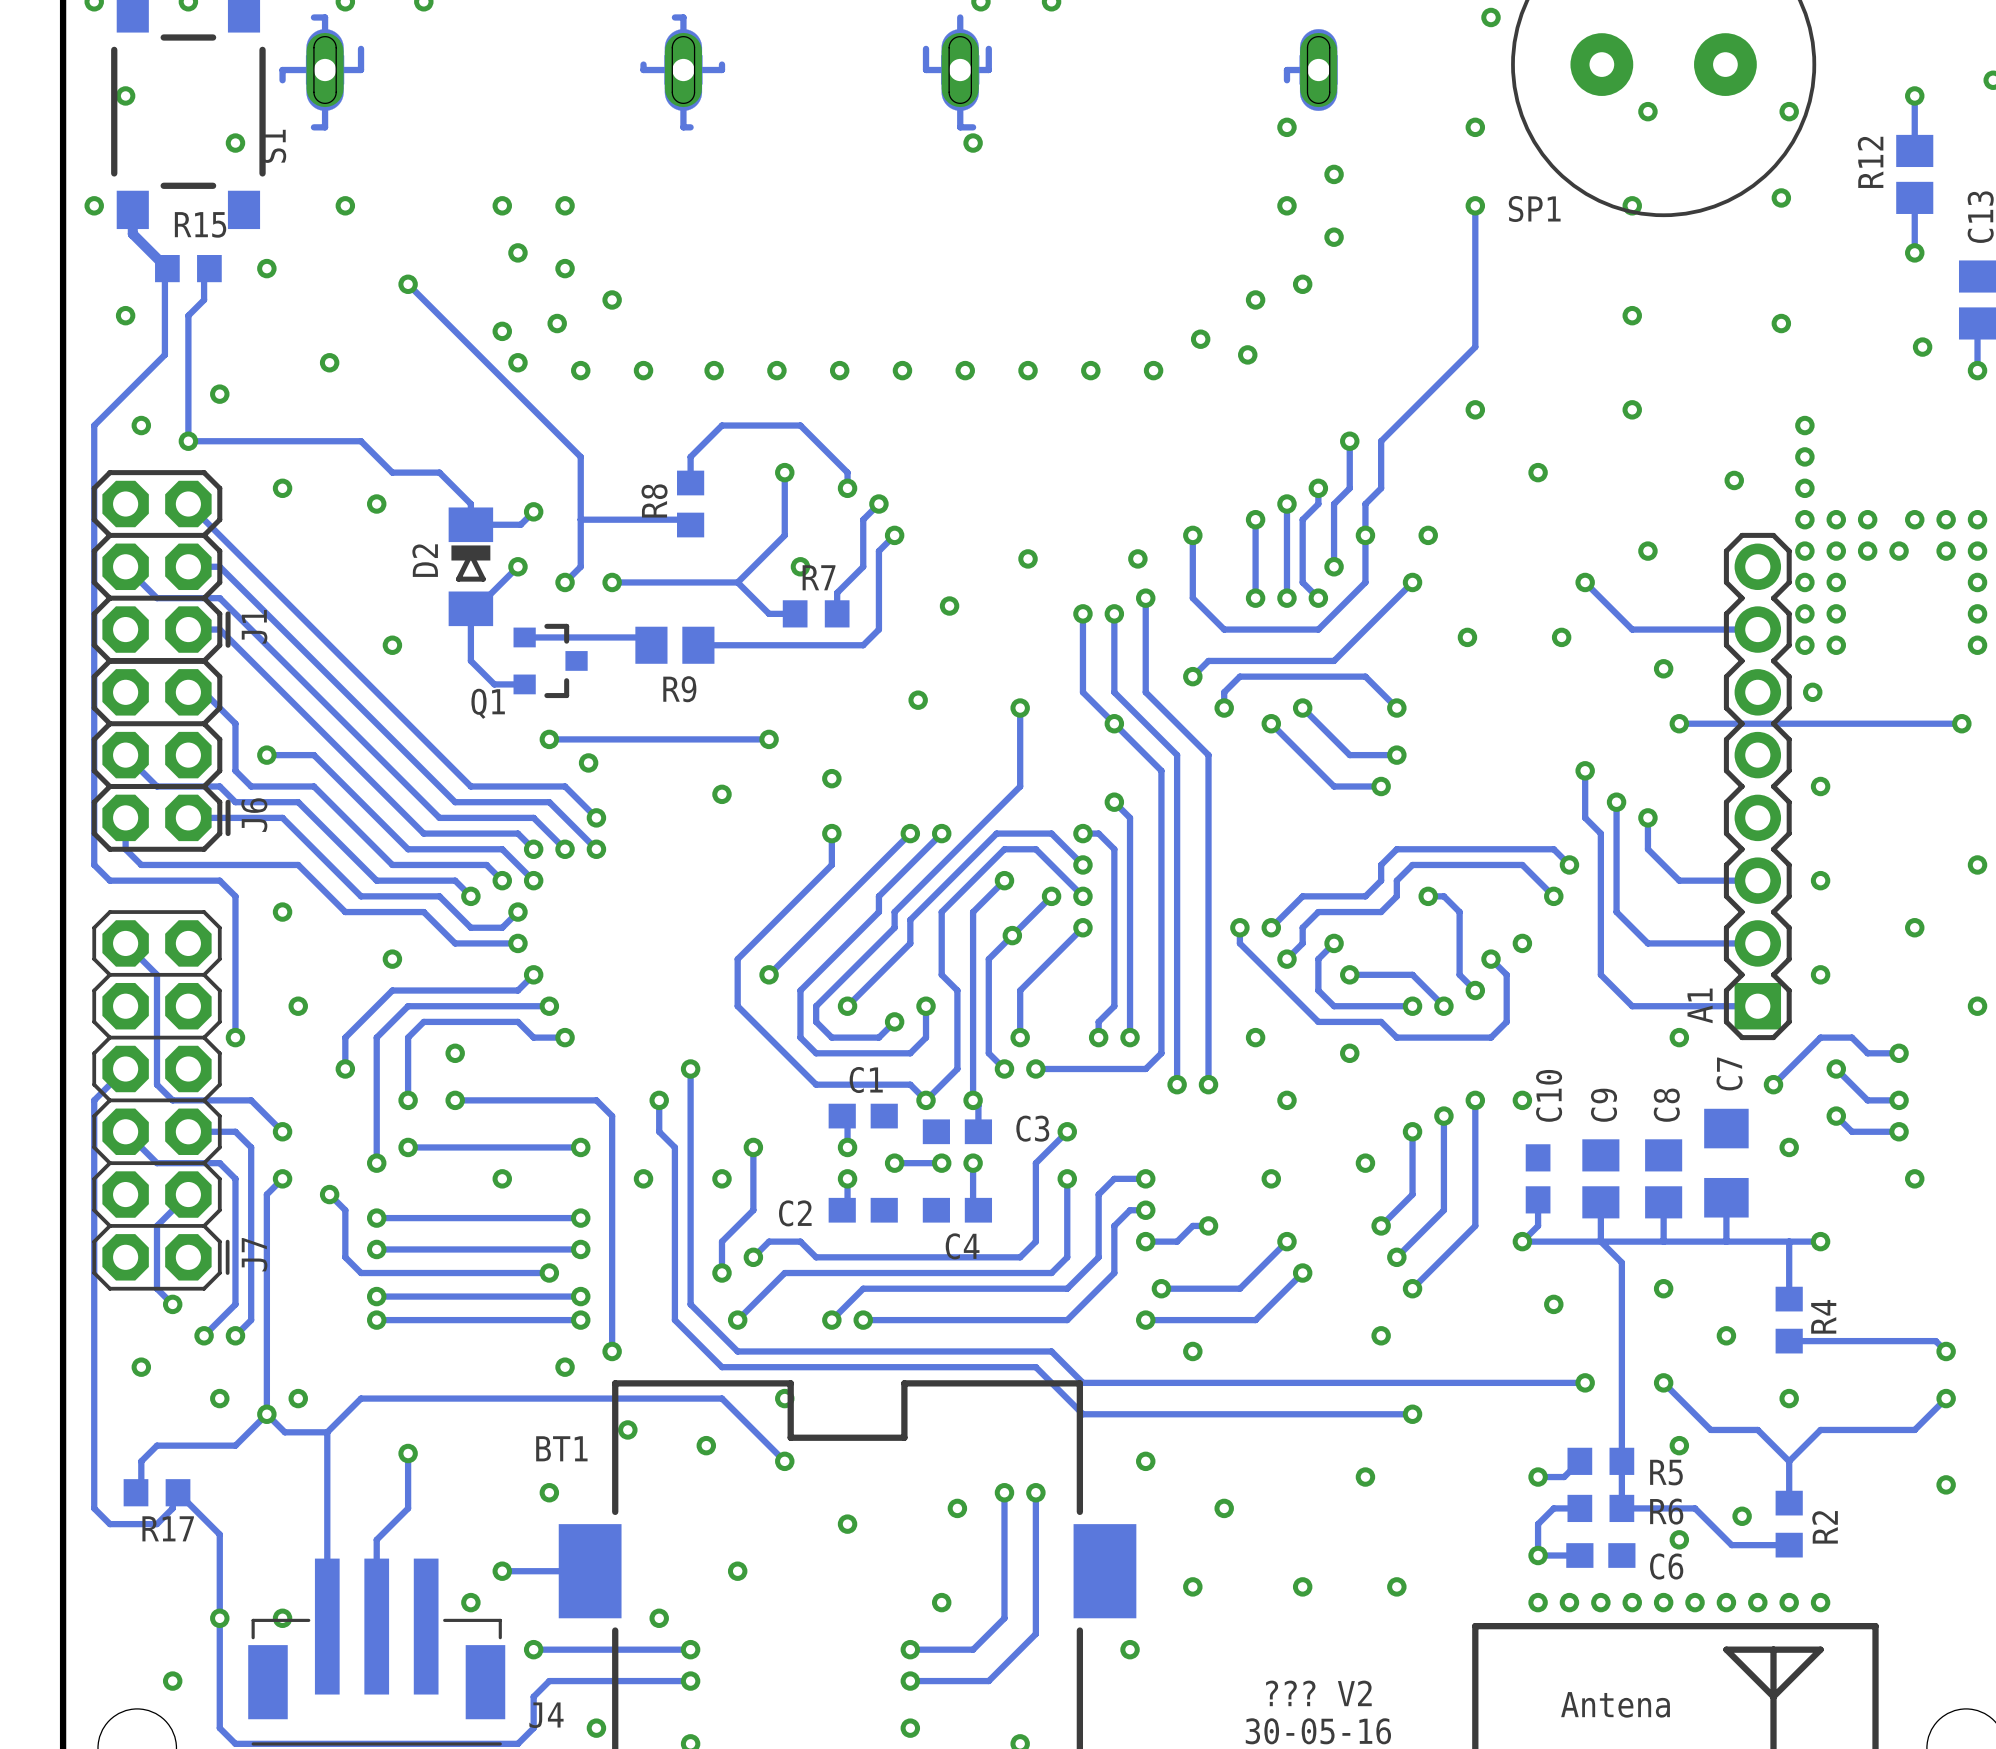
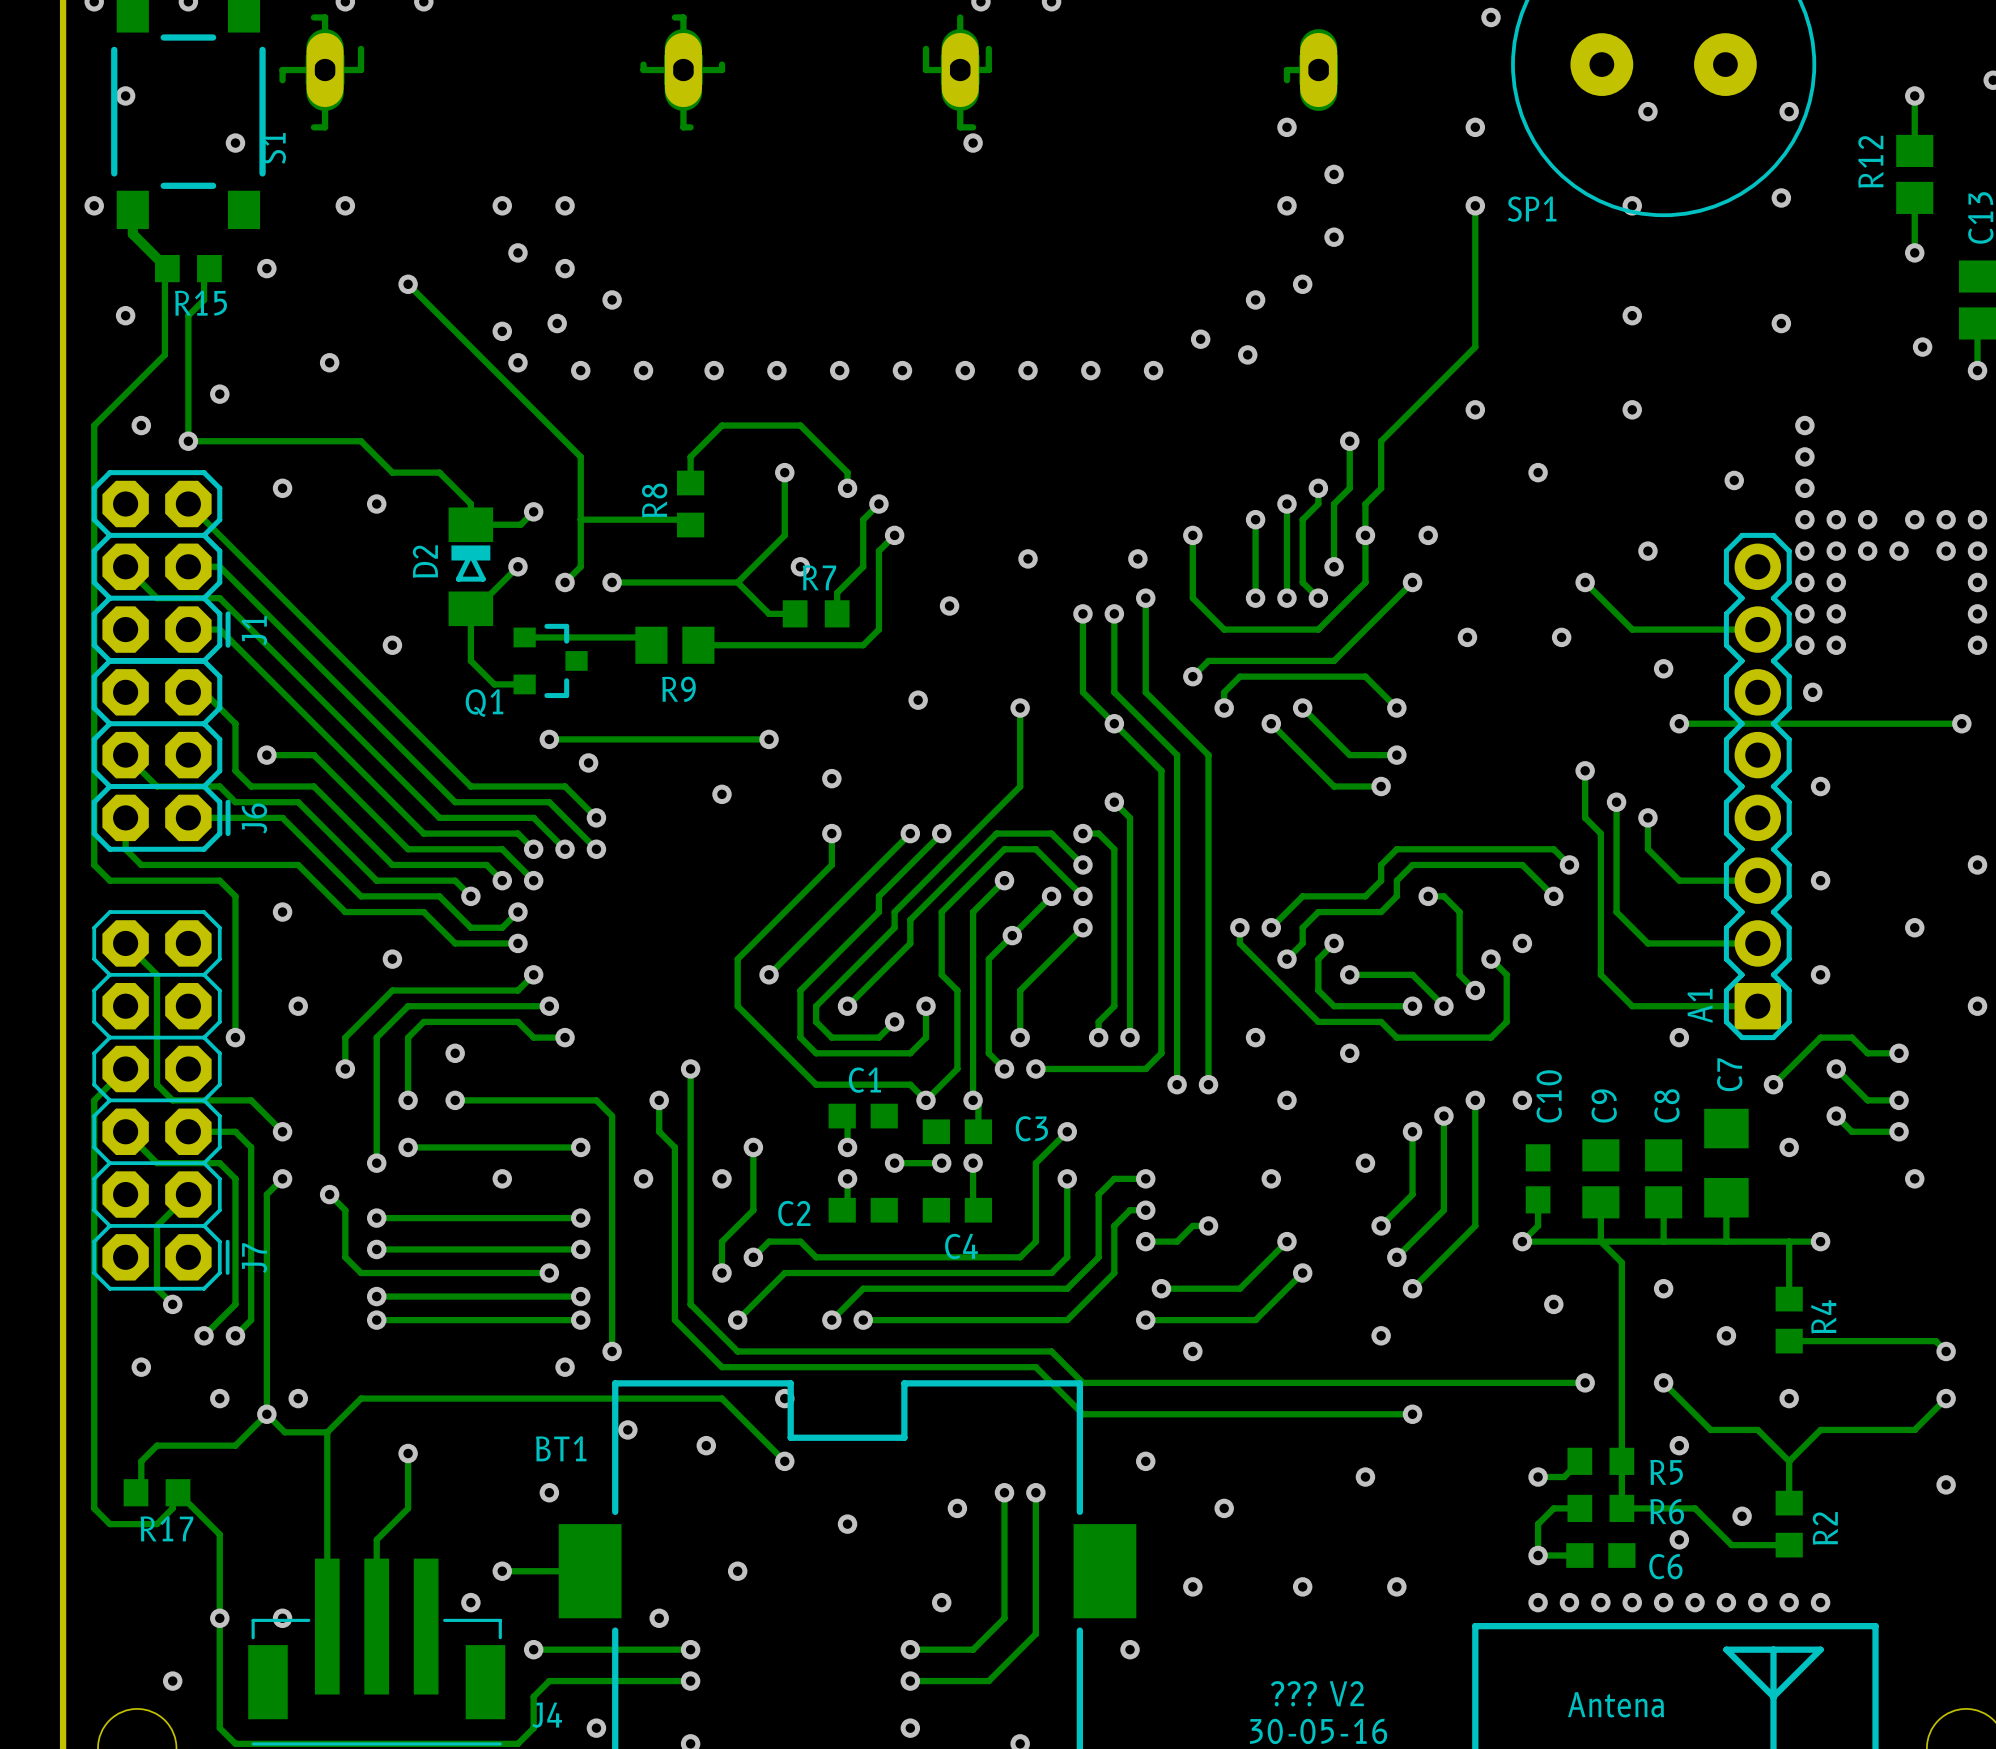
R15 name position: R15 (200, 224) -> R15 (200, 303)

